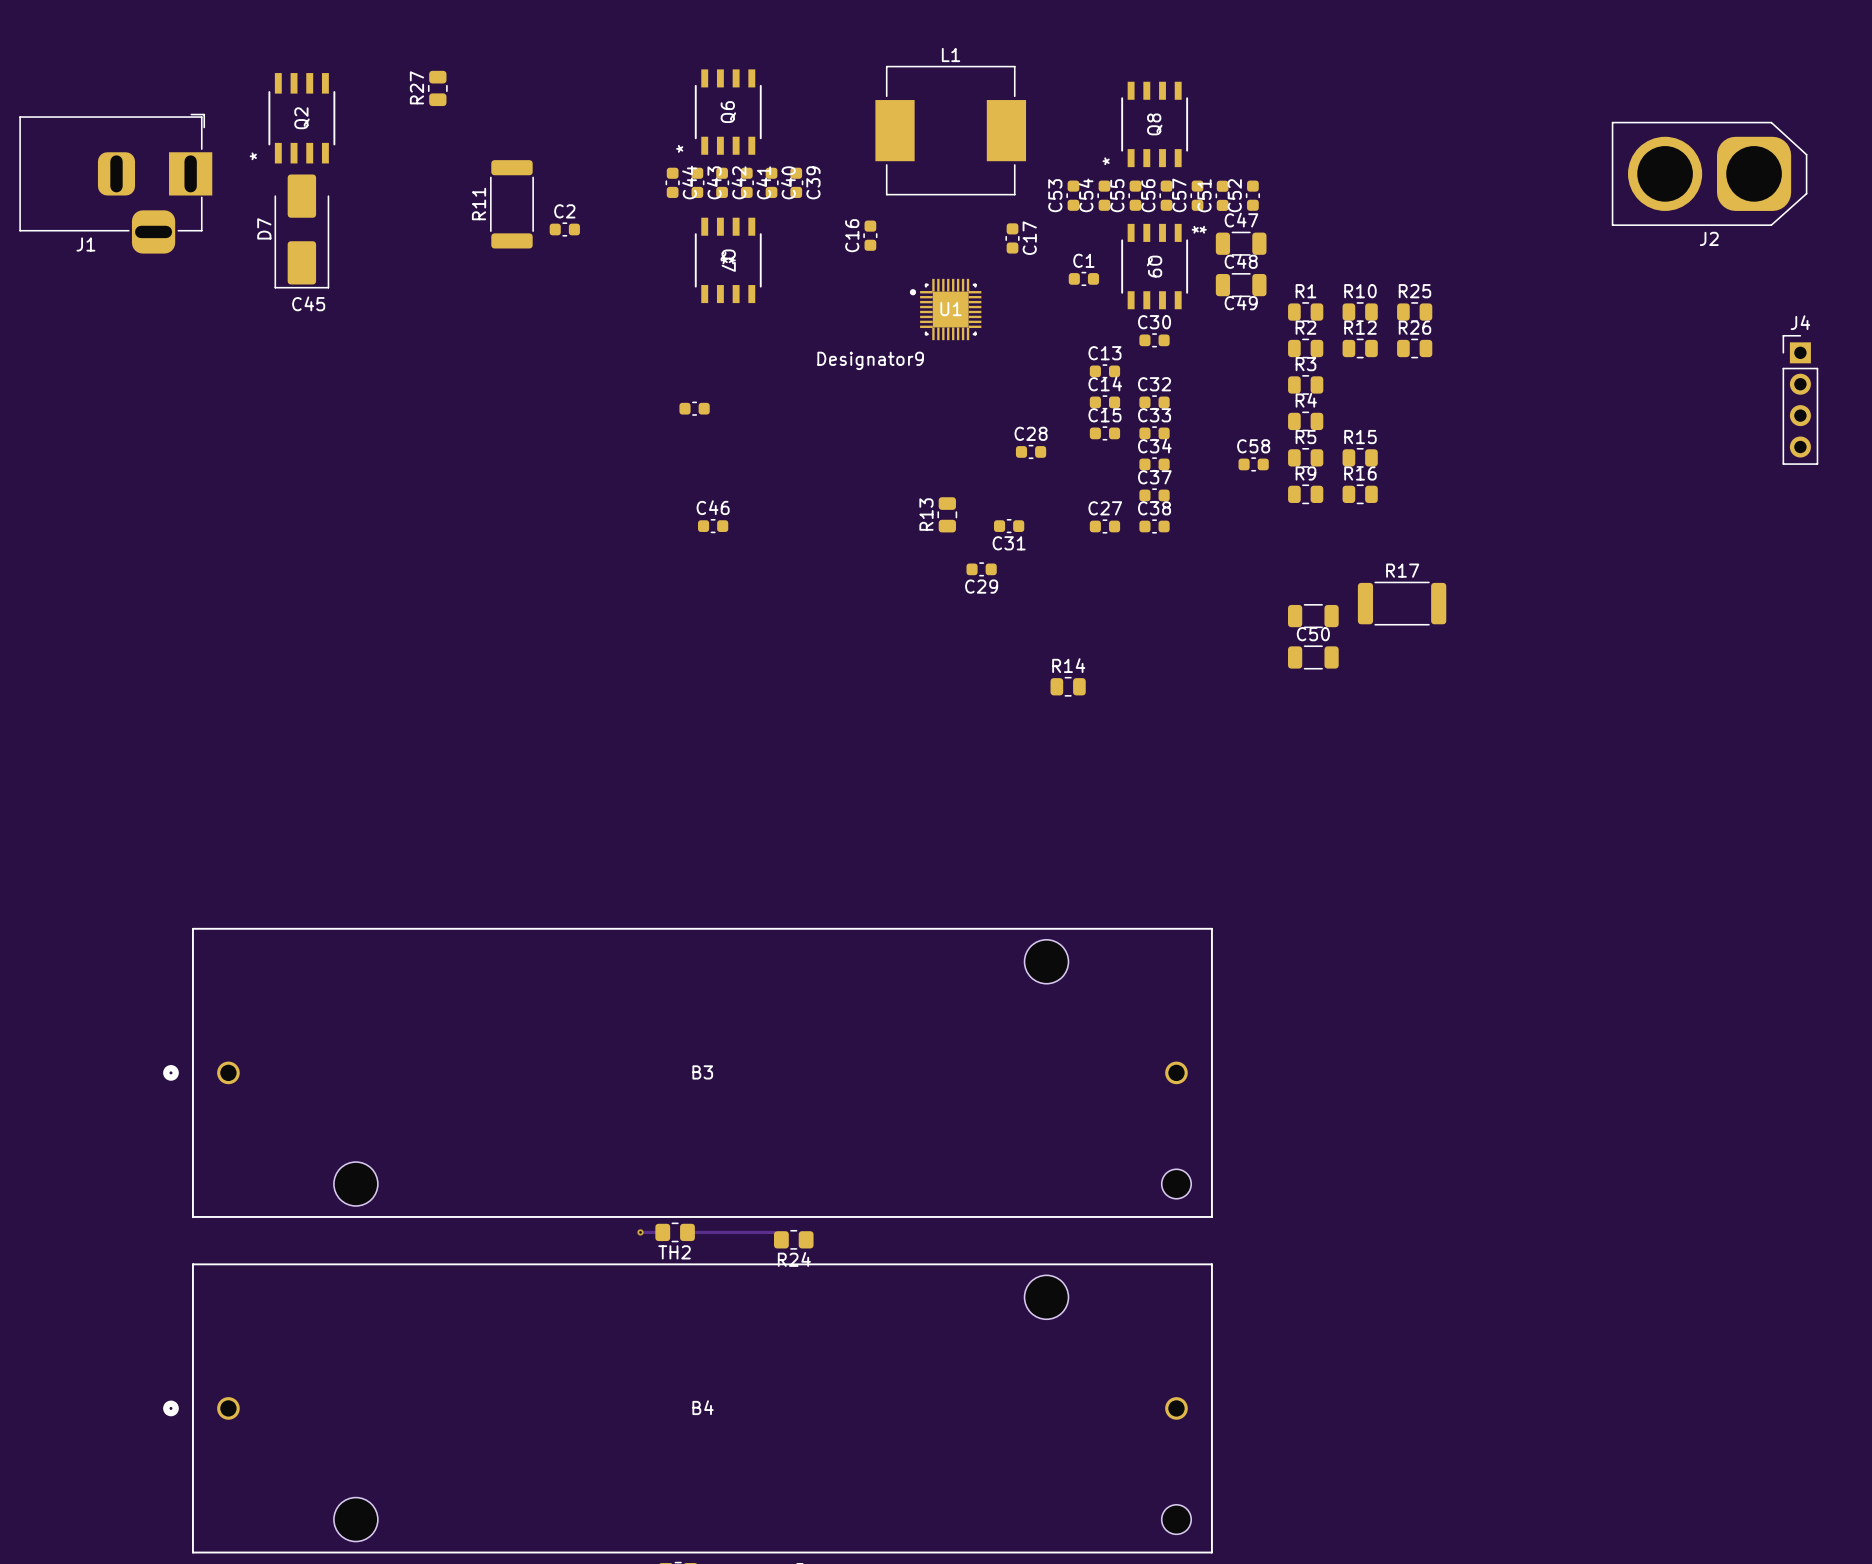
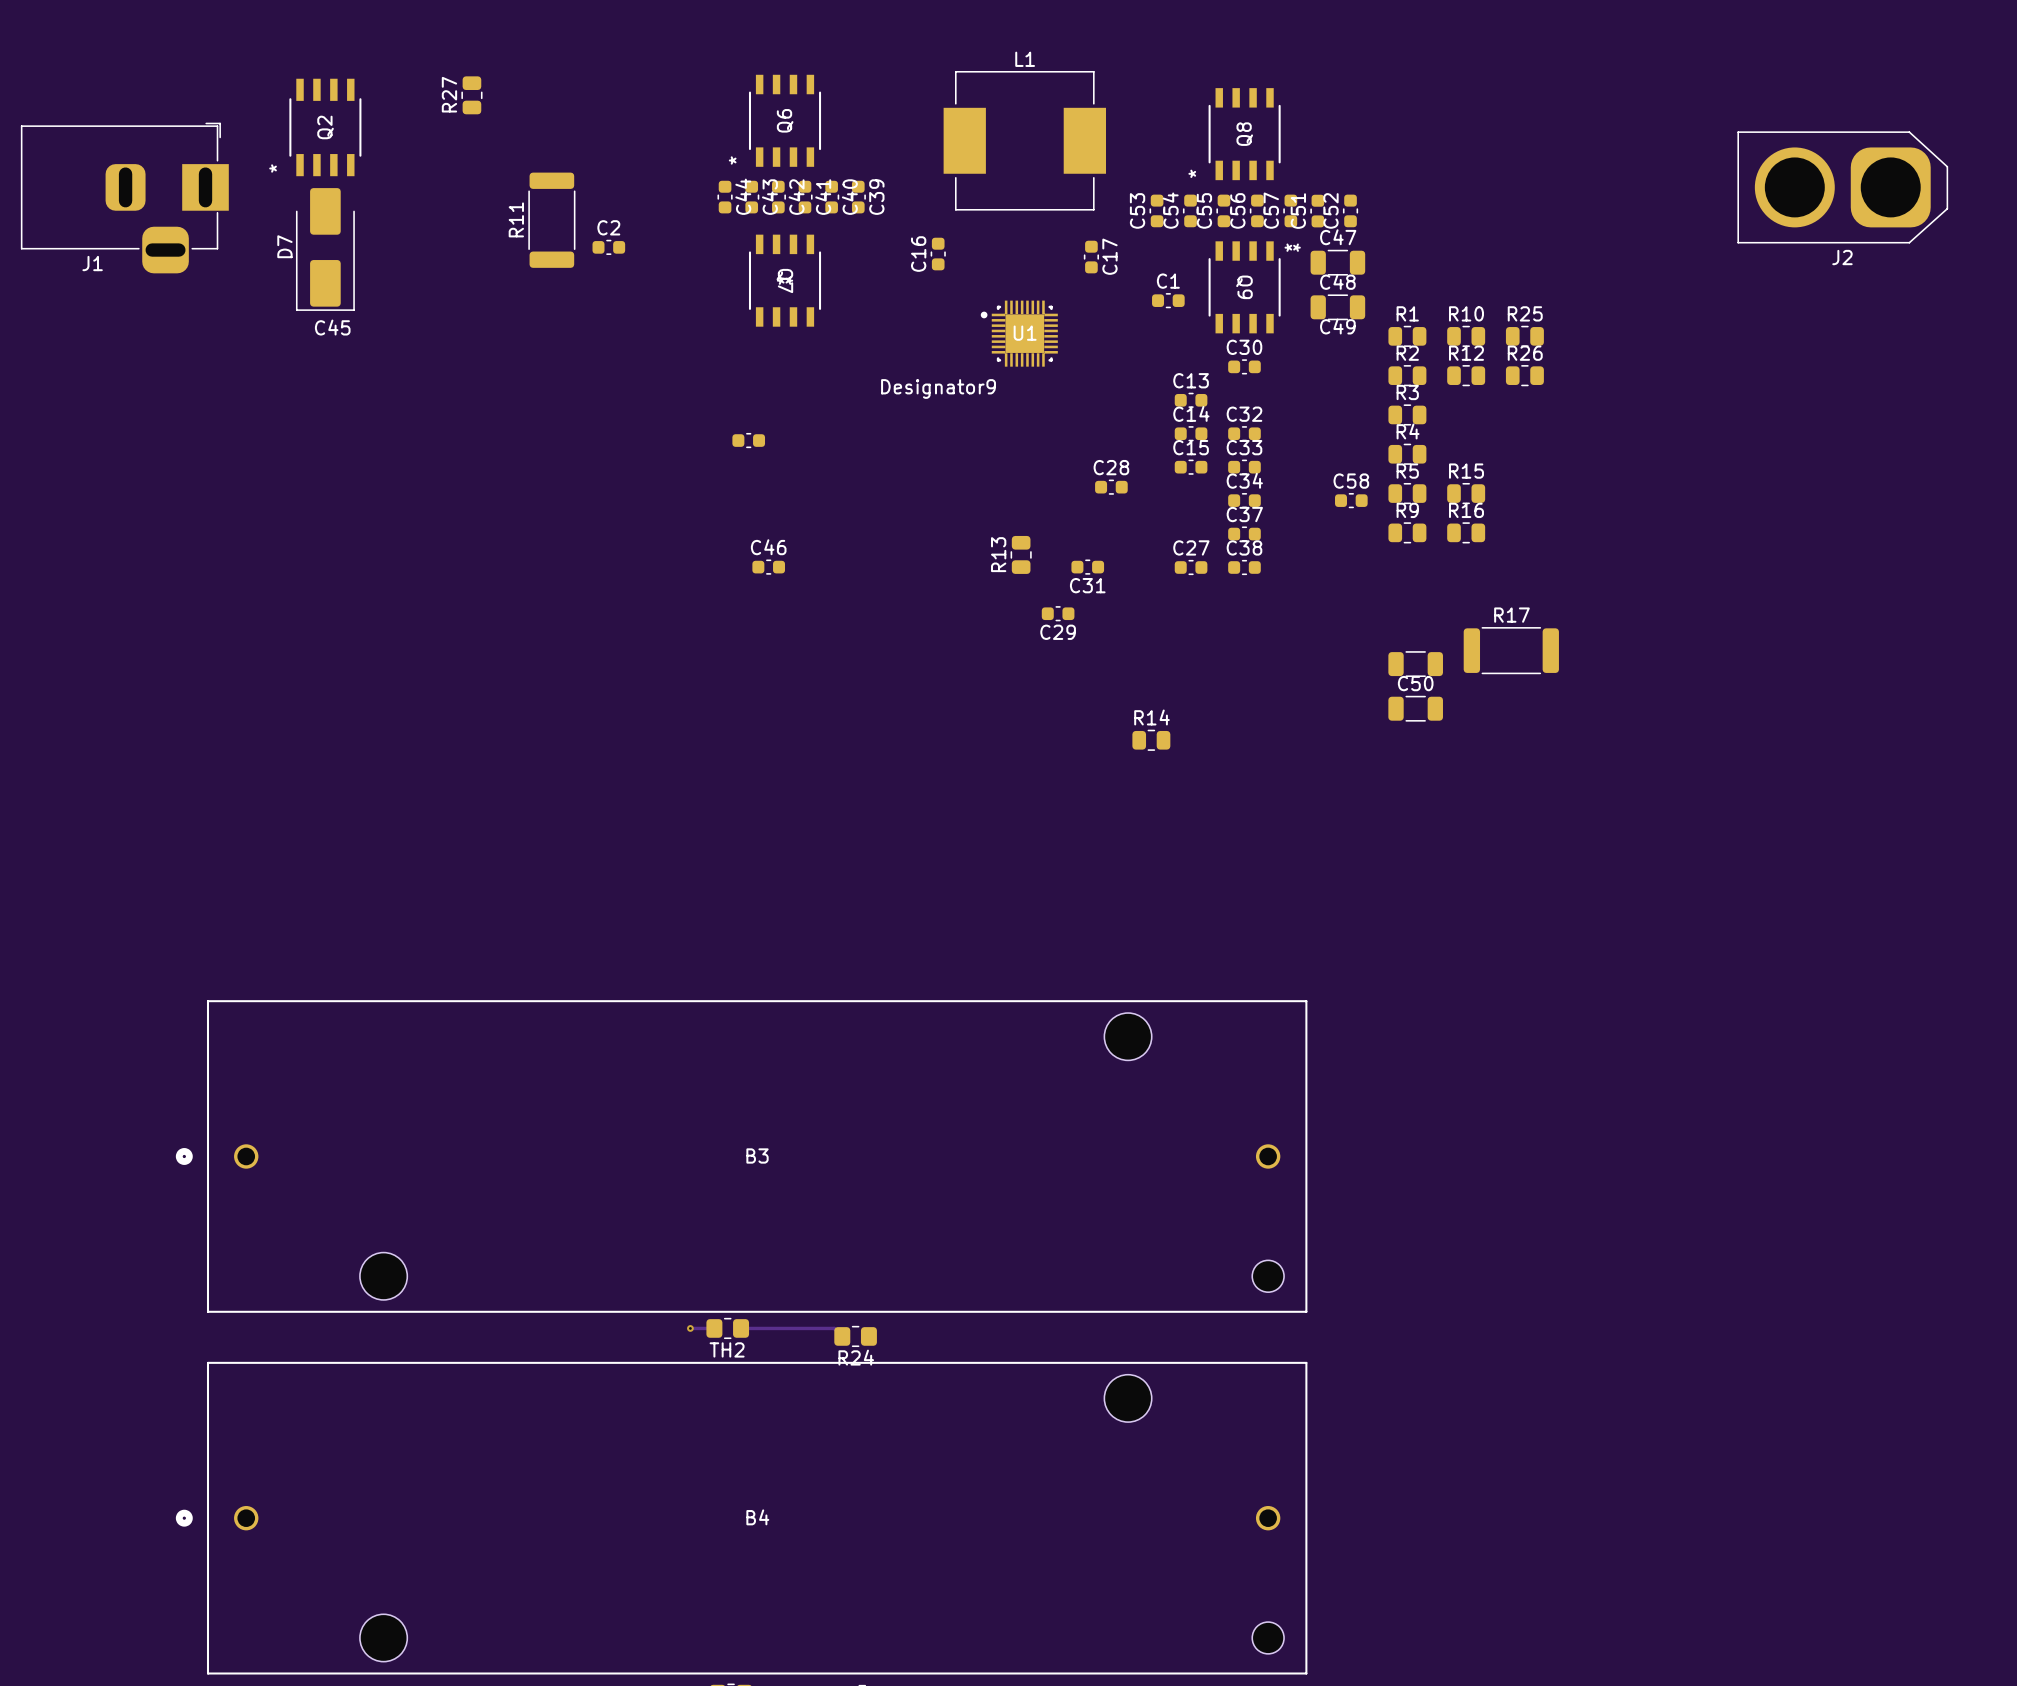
J4: (1800, 399) -> none

